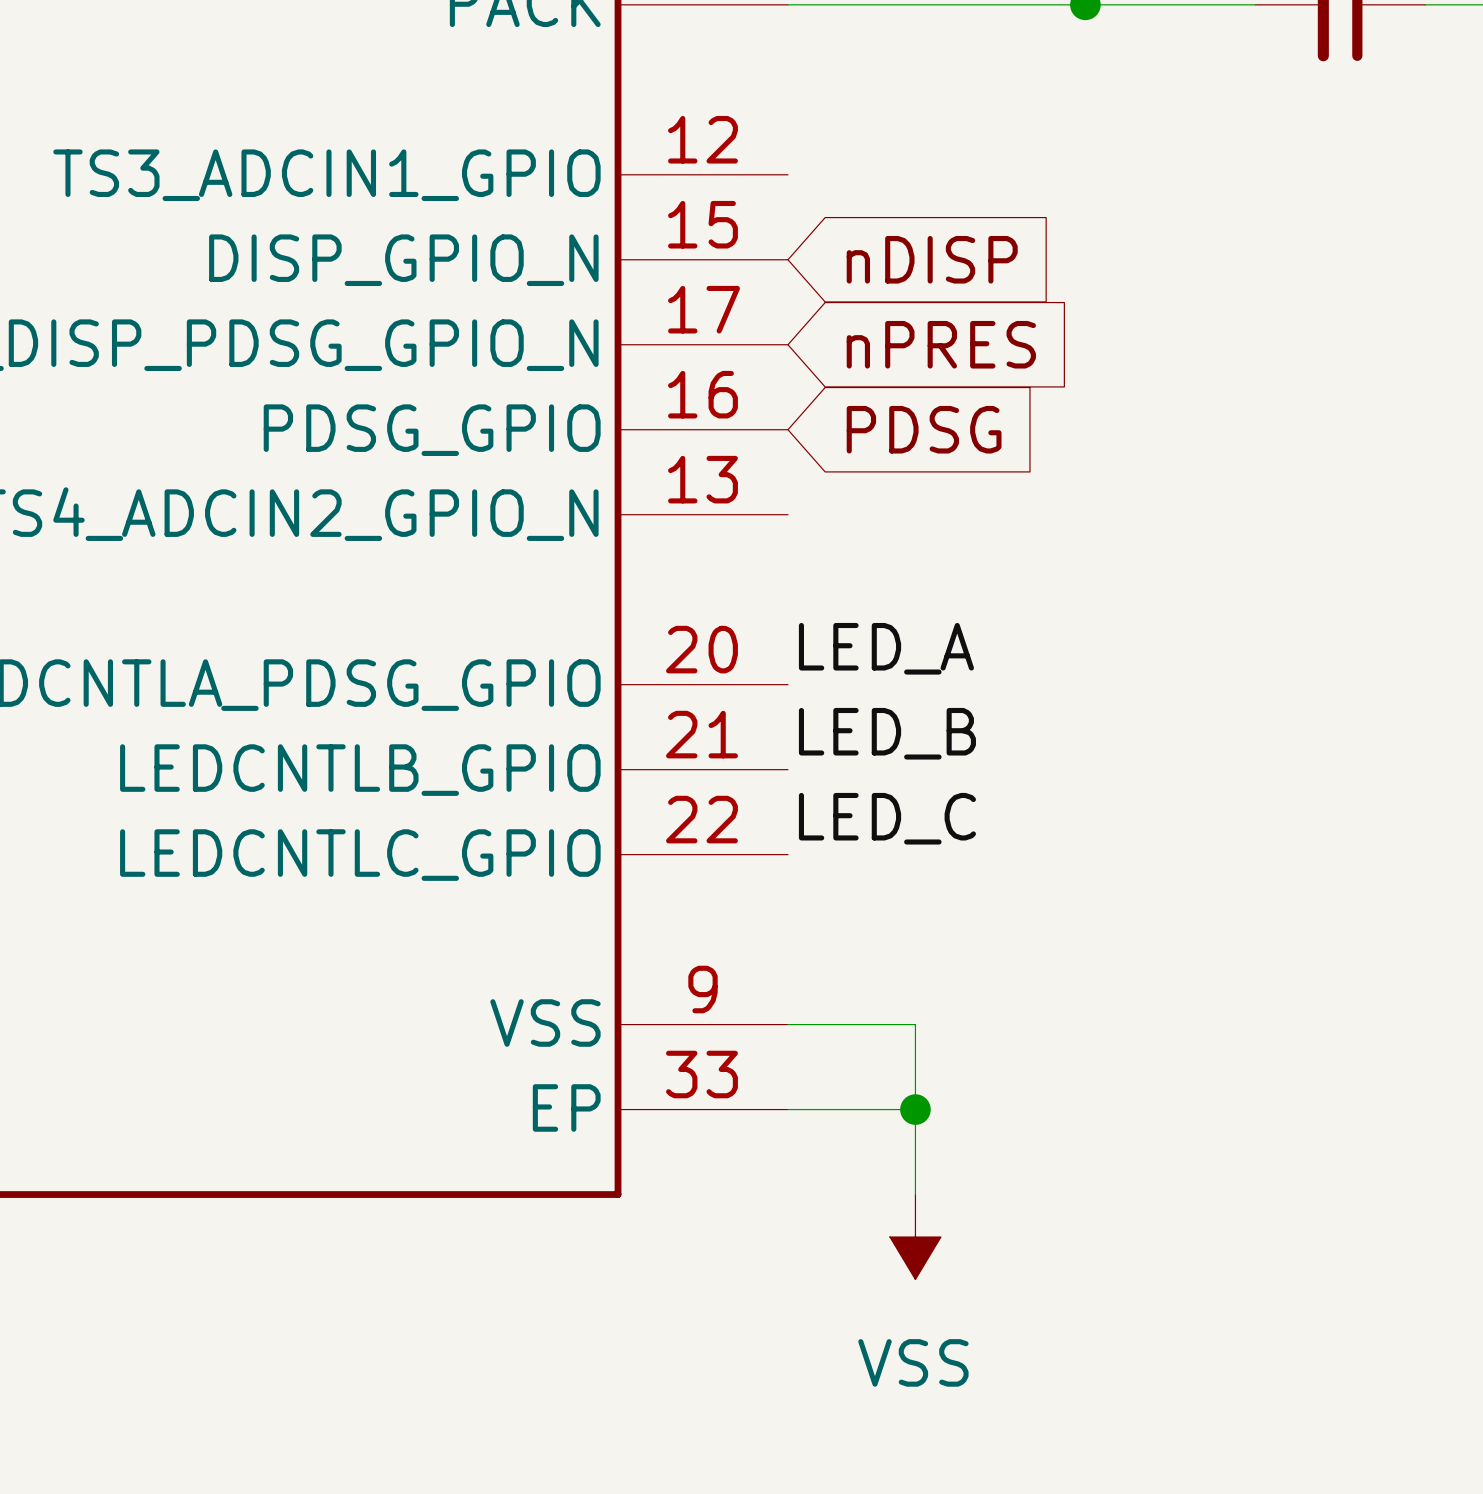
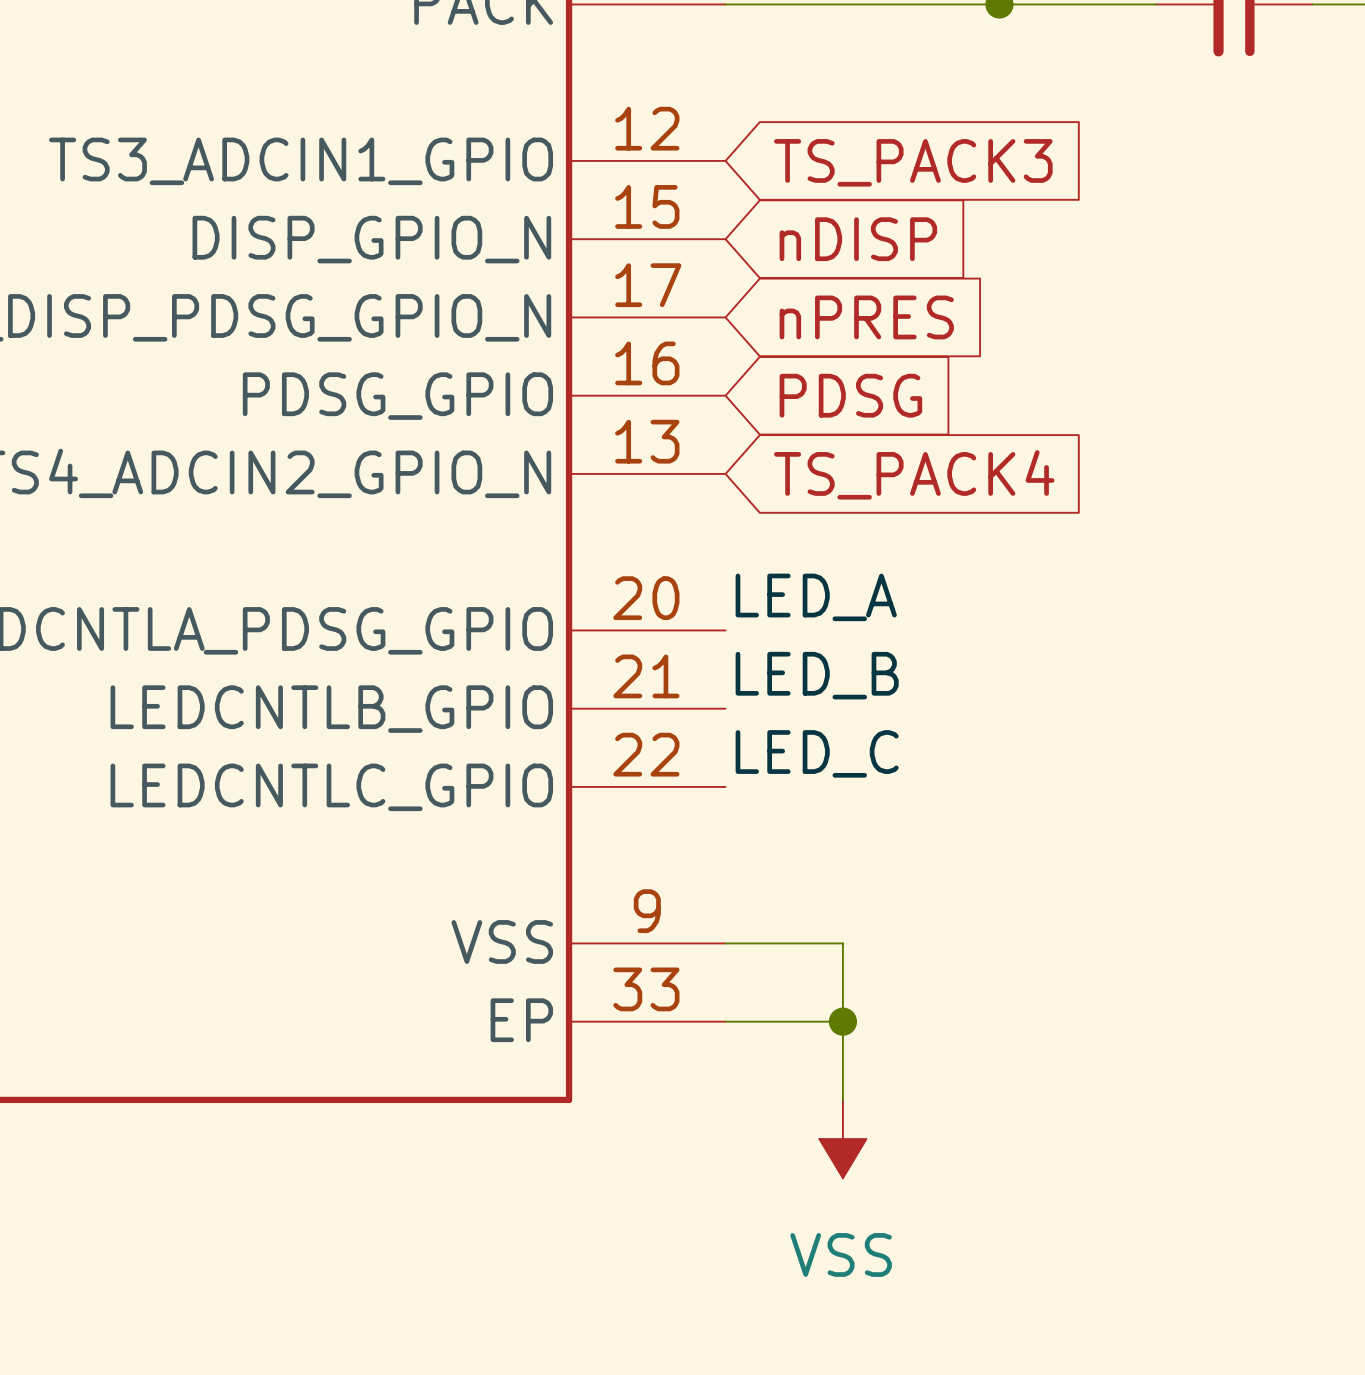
global label: none -> TS_PACK3 (913, 162)
global label: none -> TS_PACK4 (914, 474)

